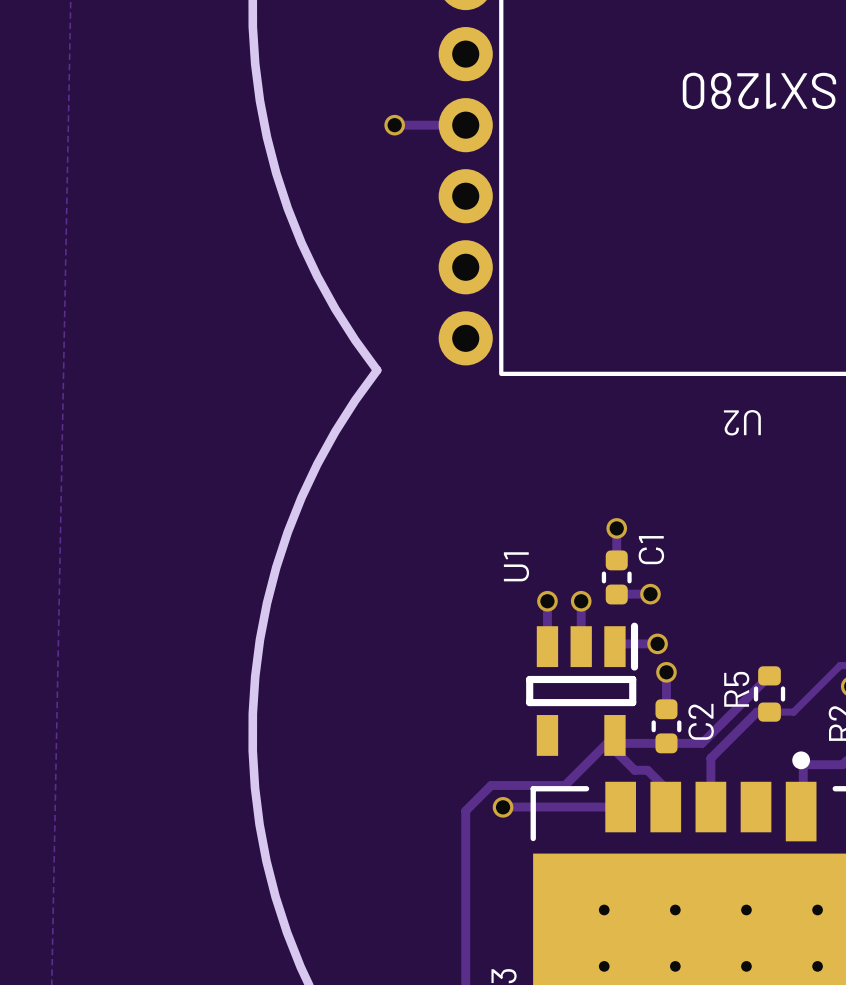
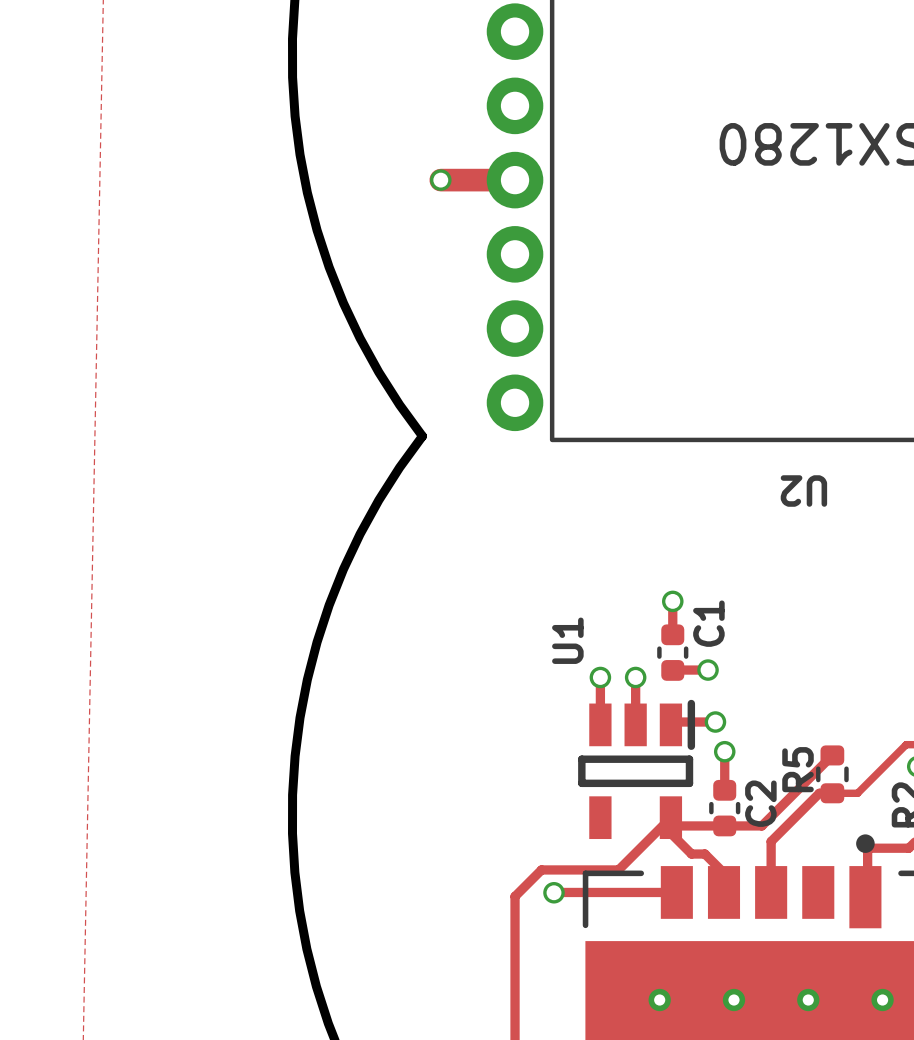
track width: thin (394, 125) (465, 125) -> thick (440, 180) (515, 180)

